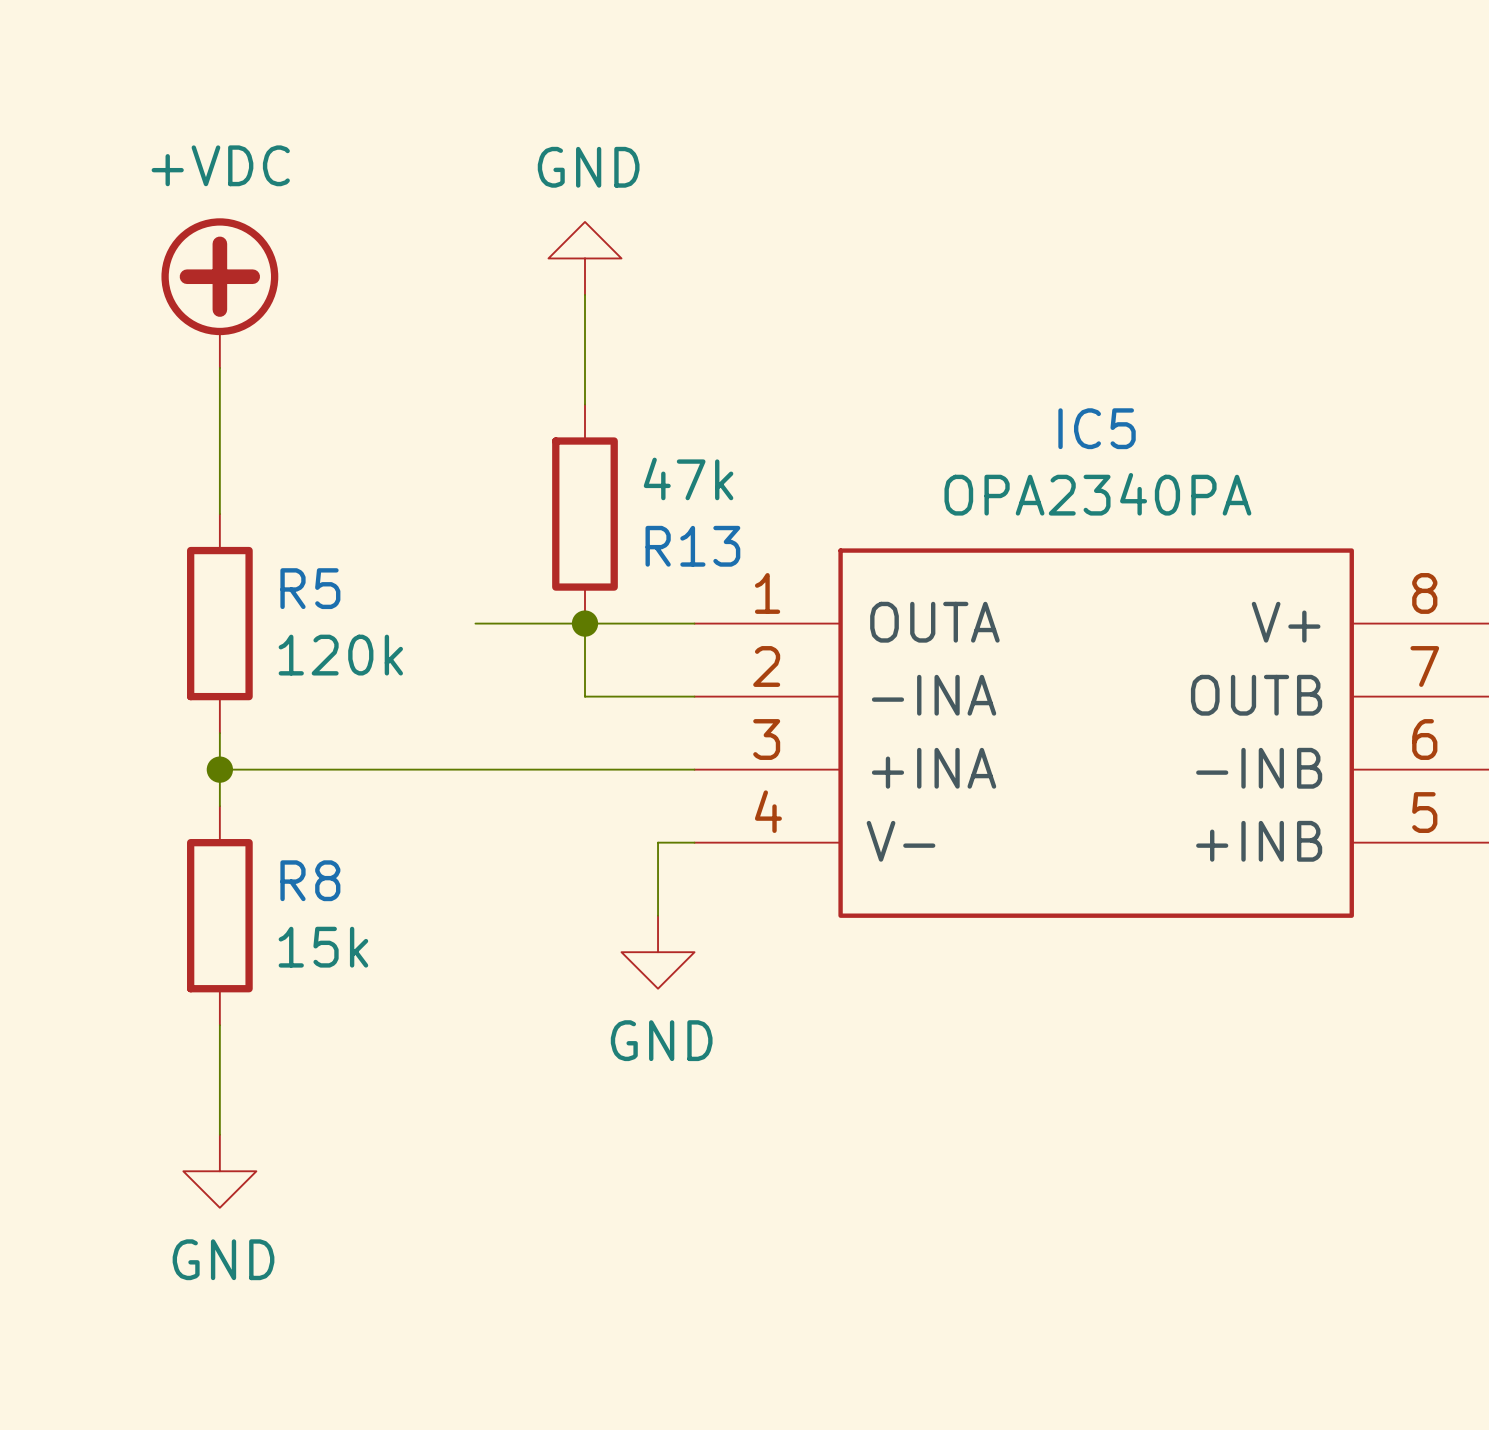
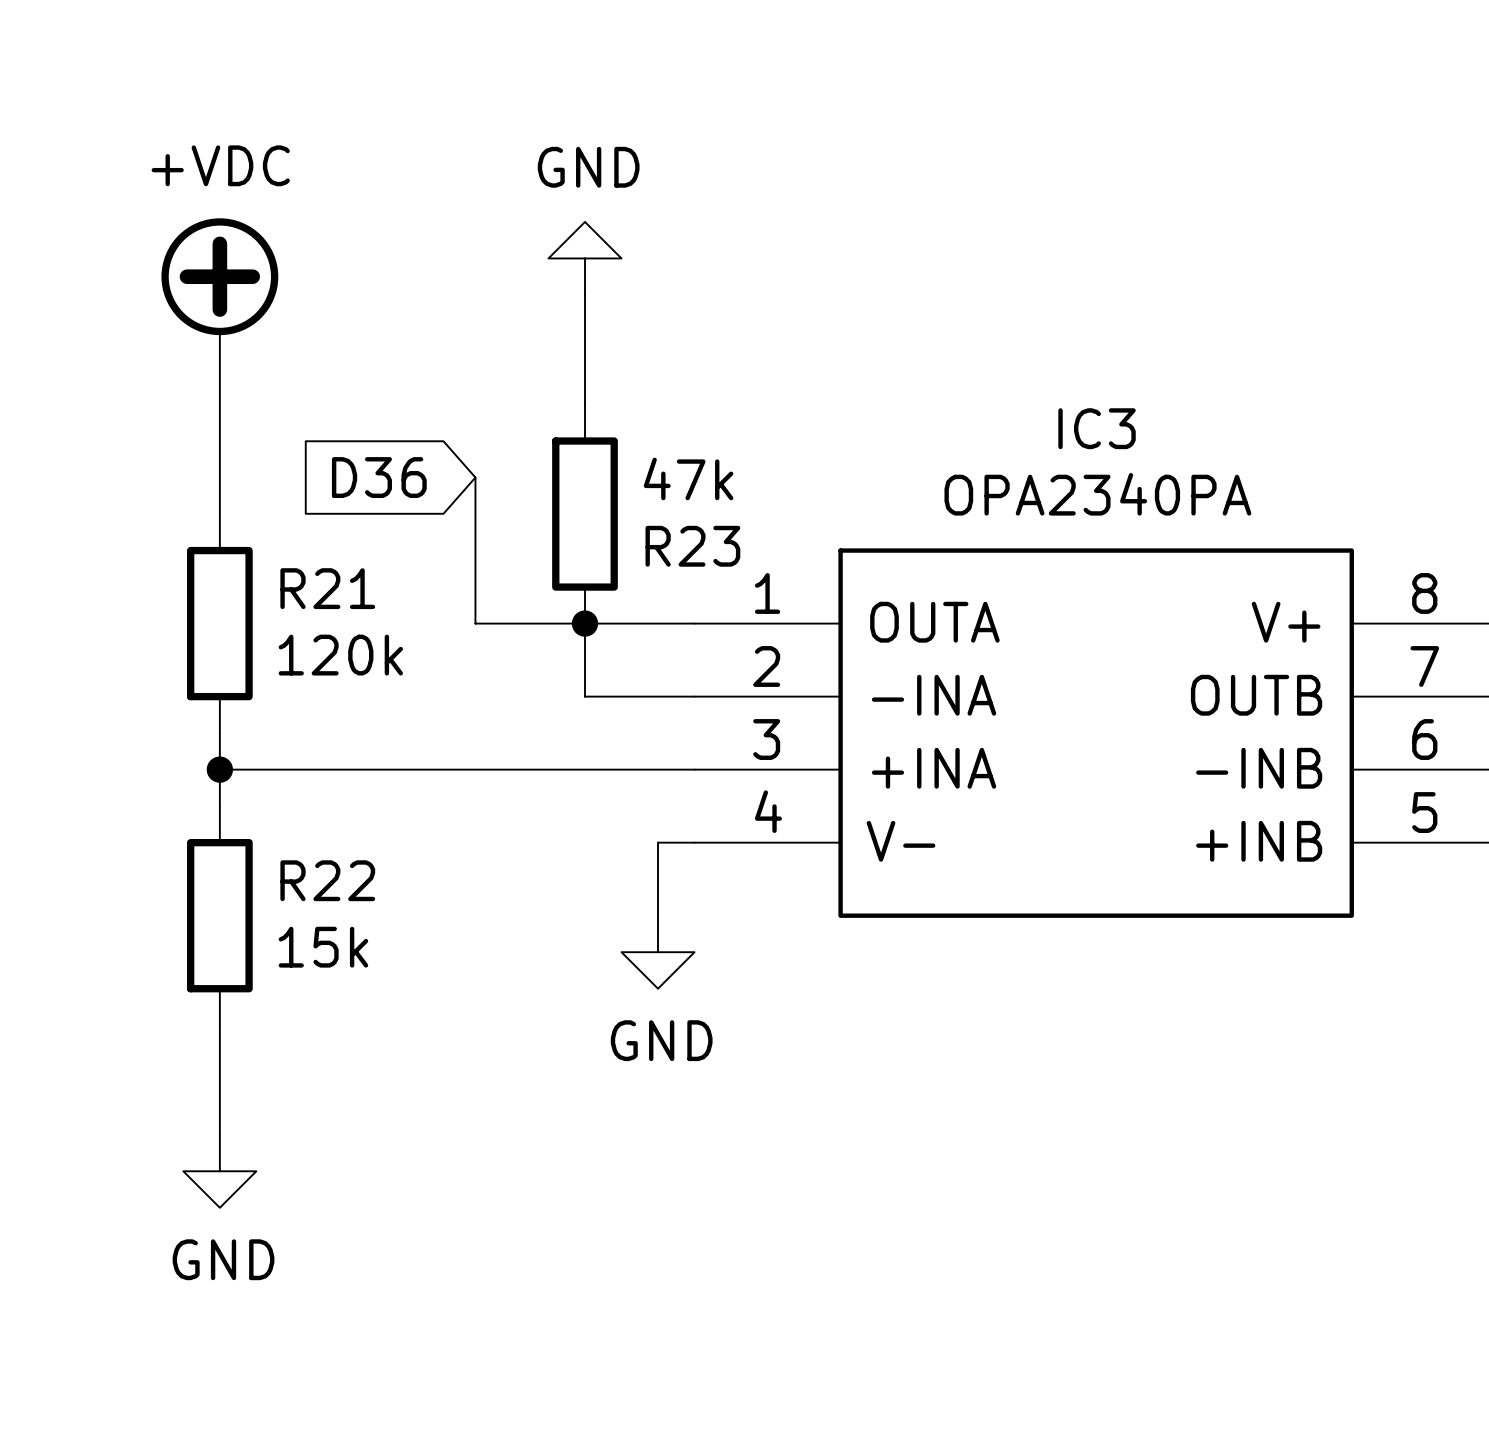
IC5 name: IC5 (1097, 428) -> IC3 (1097, 428)
global label: none -> D36 (379, 477)
wire: none -> (475, 477) (475, 623)
R13 name: R13 (692, 546) -> R23 (692, 546)
R5 name: R5 (310, 588) -> R21 (327, 588)
R8 name: R8 (310, 880) -> R22 (327, 880)

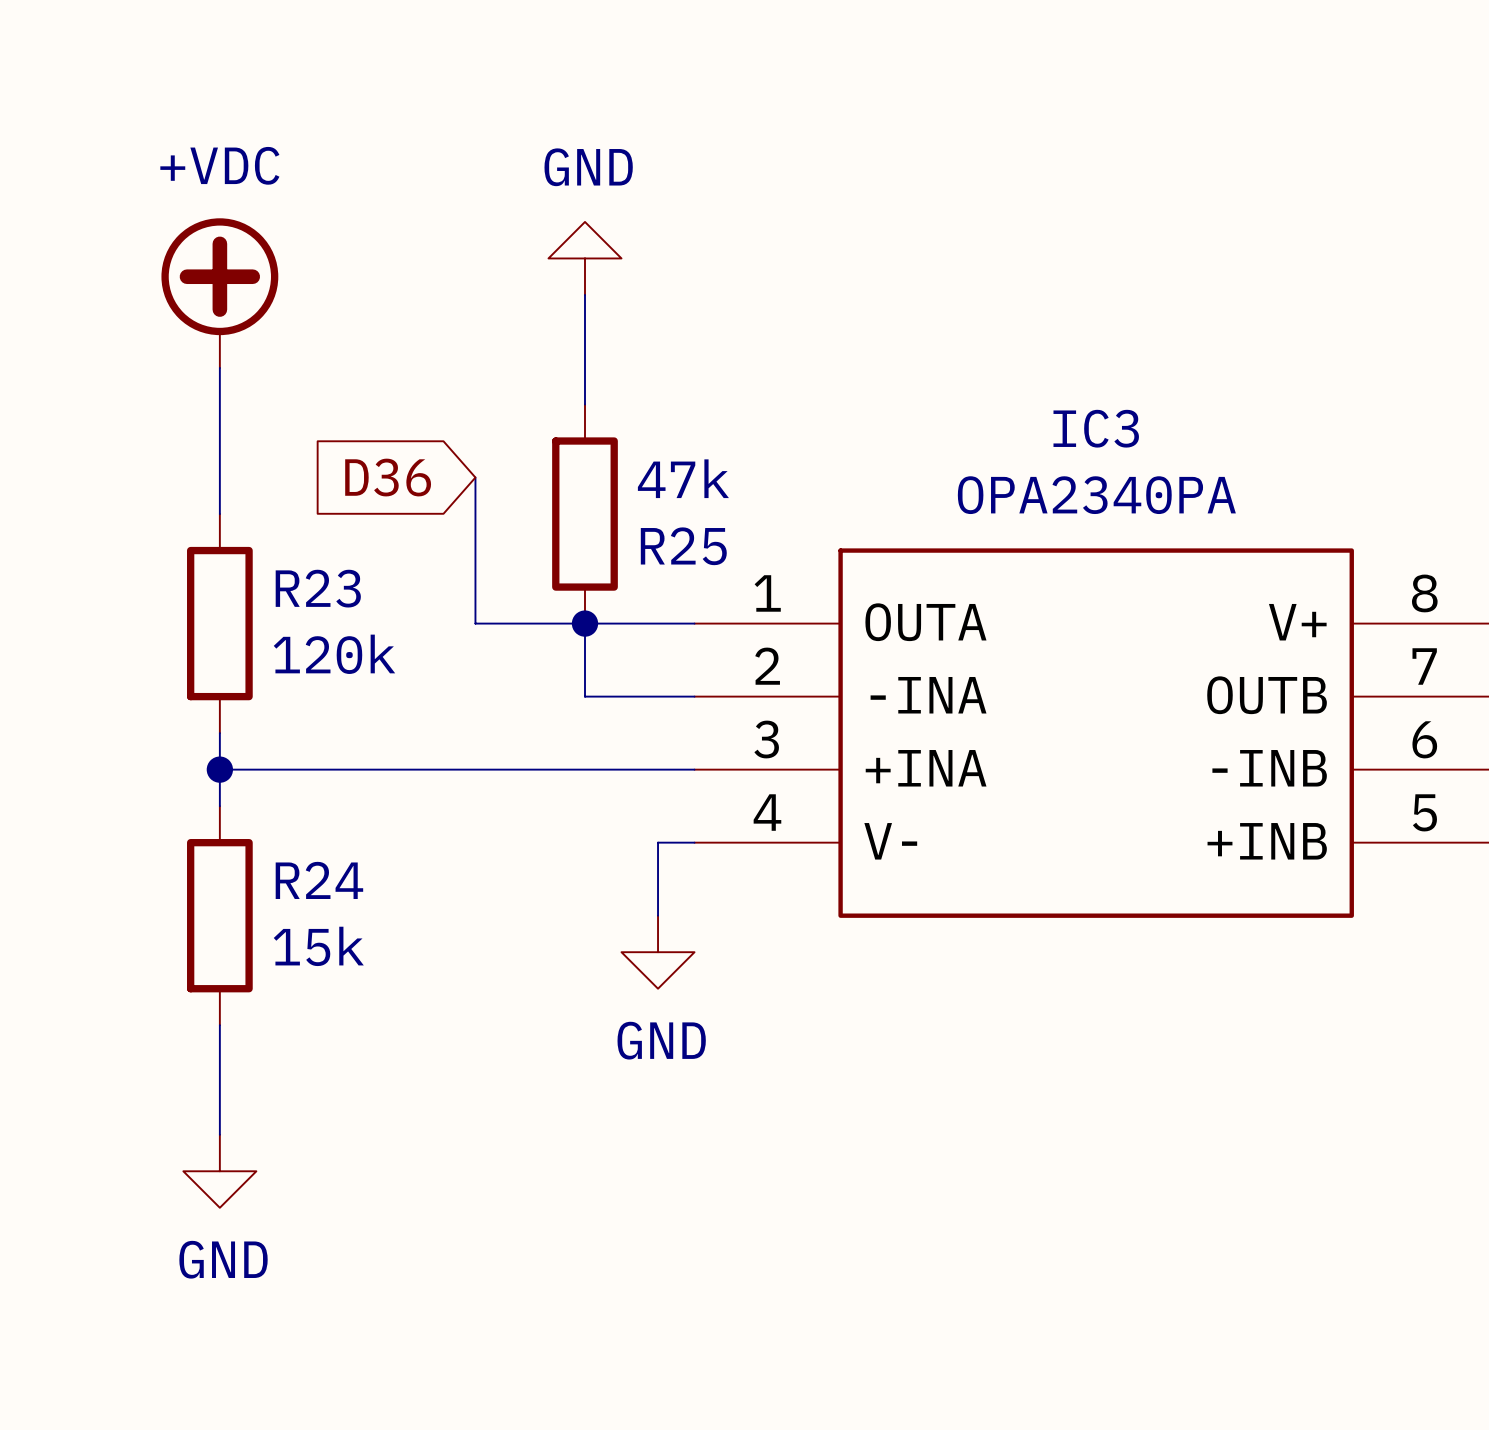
R23 name: R23 (692, 546) -> R25 (683, 546)
R21 name: R21 (327, 588) -> R23 (318, 588)
R22 name: R22 (327, 880) -> R24 (319, 880)

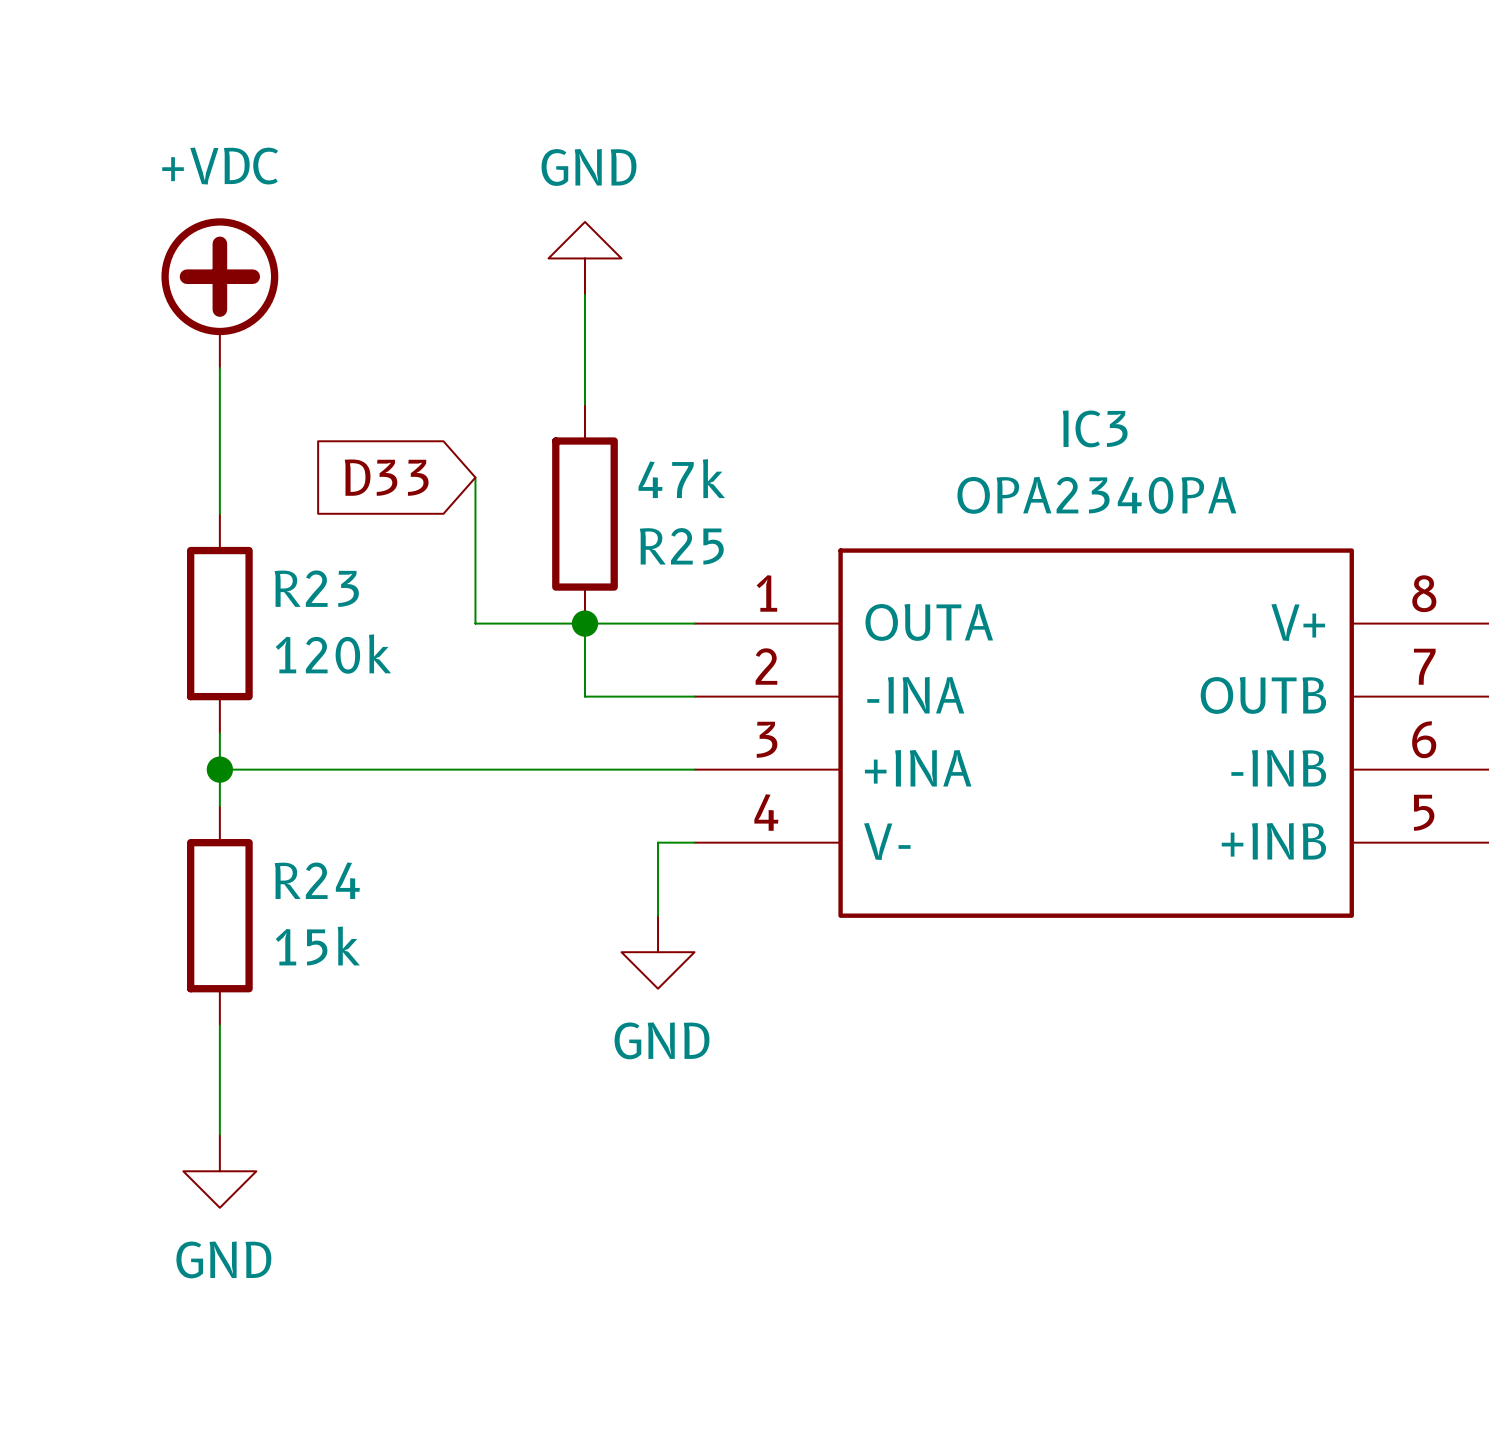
global label: D36 (388, 477) -> D33 (386, 477)

